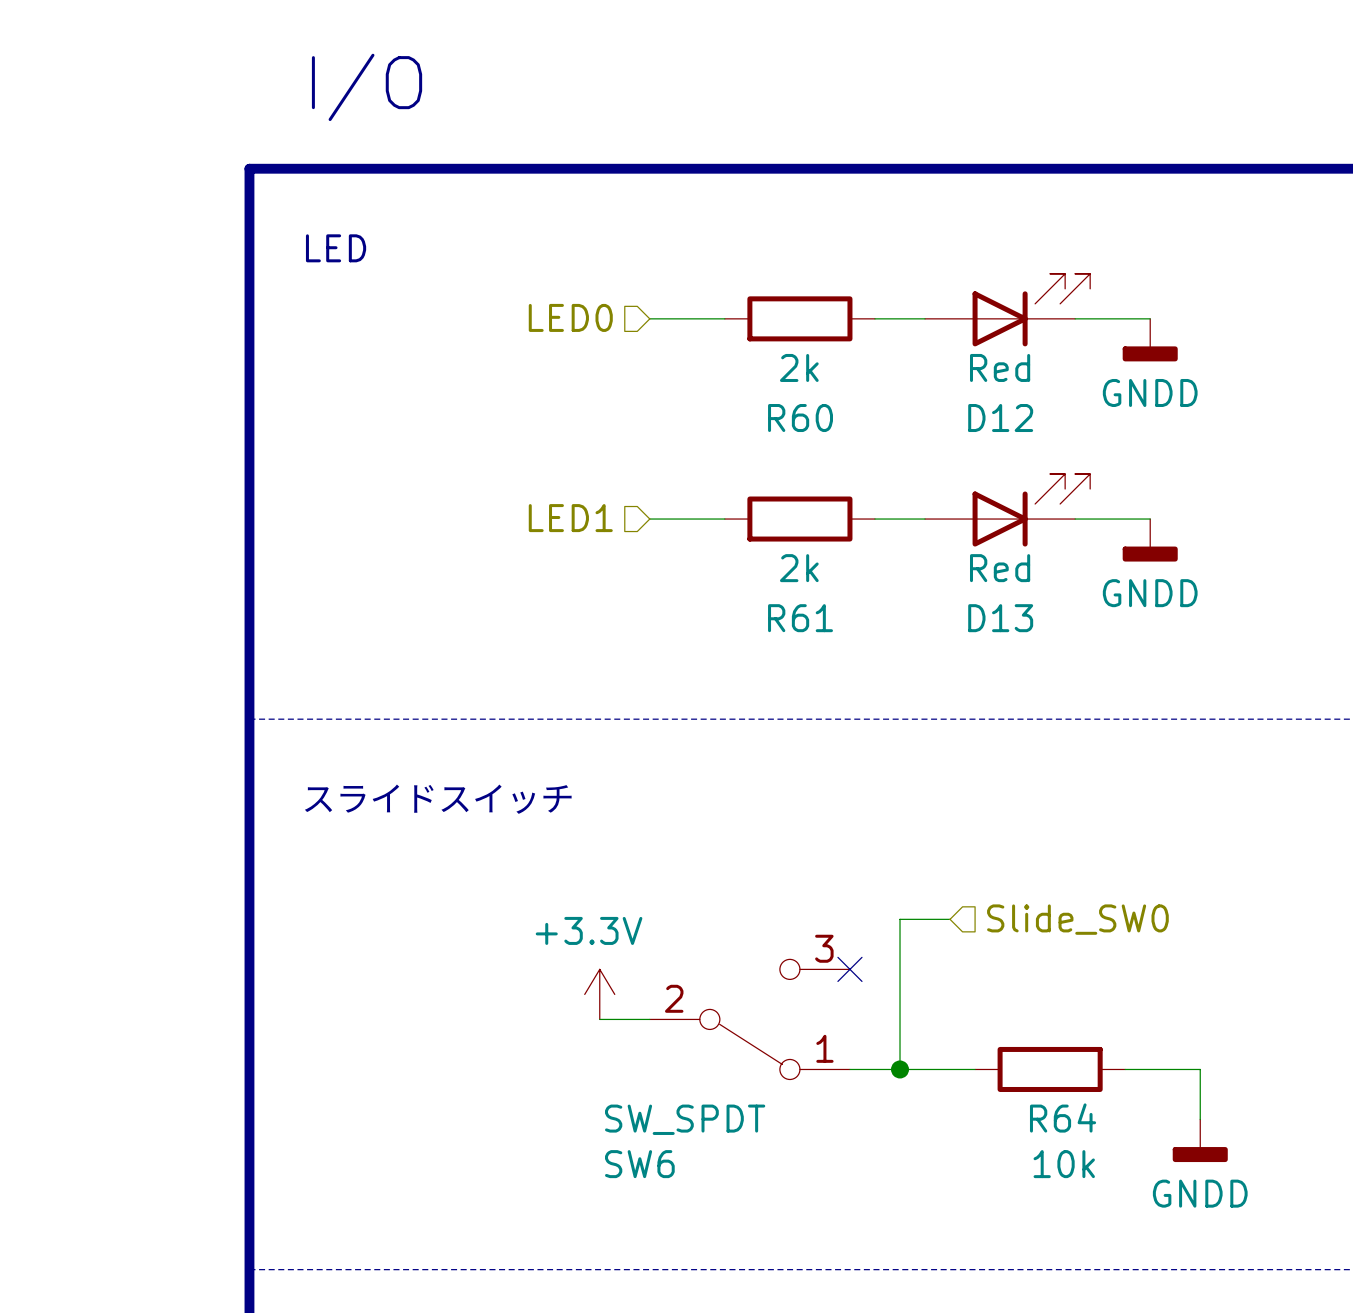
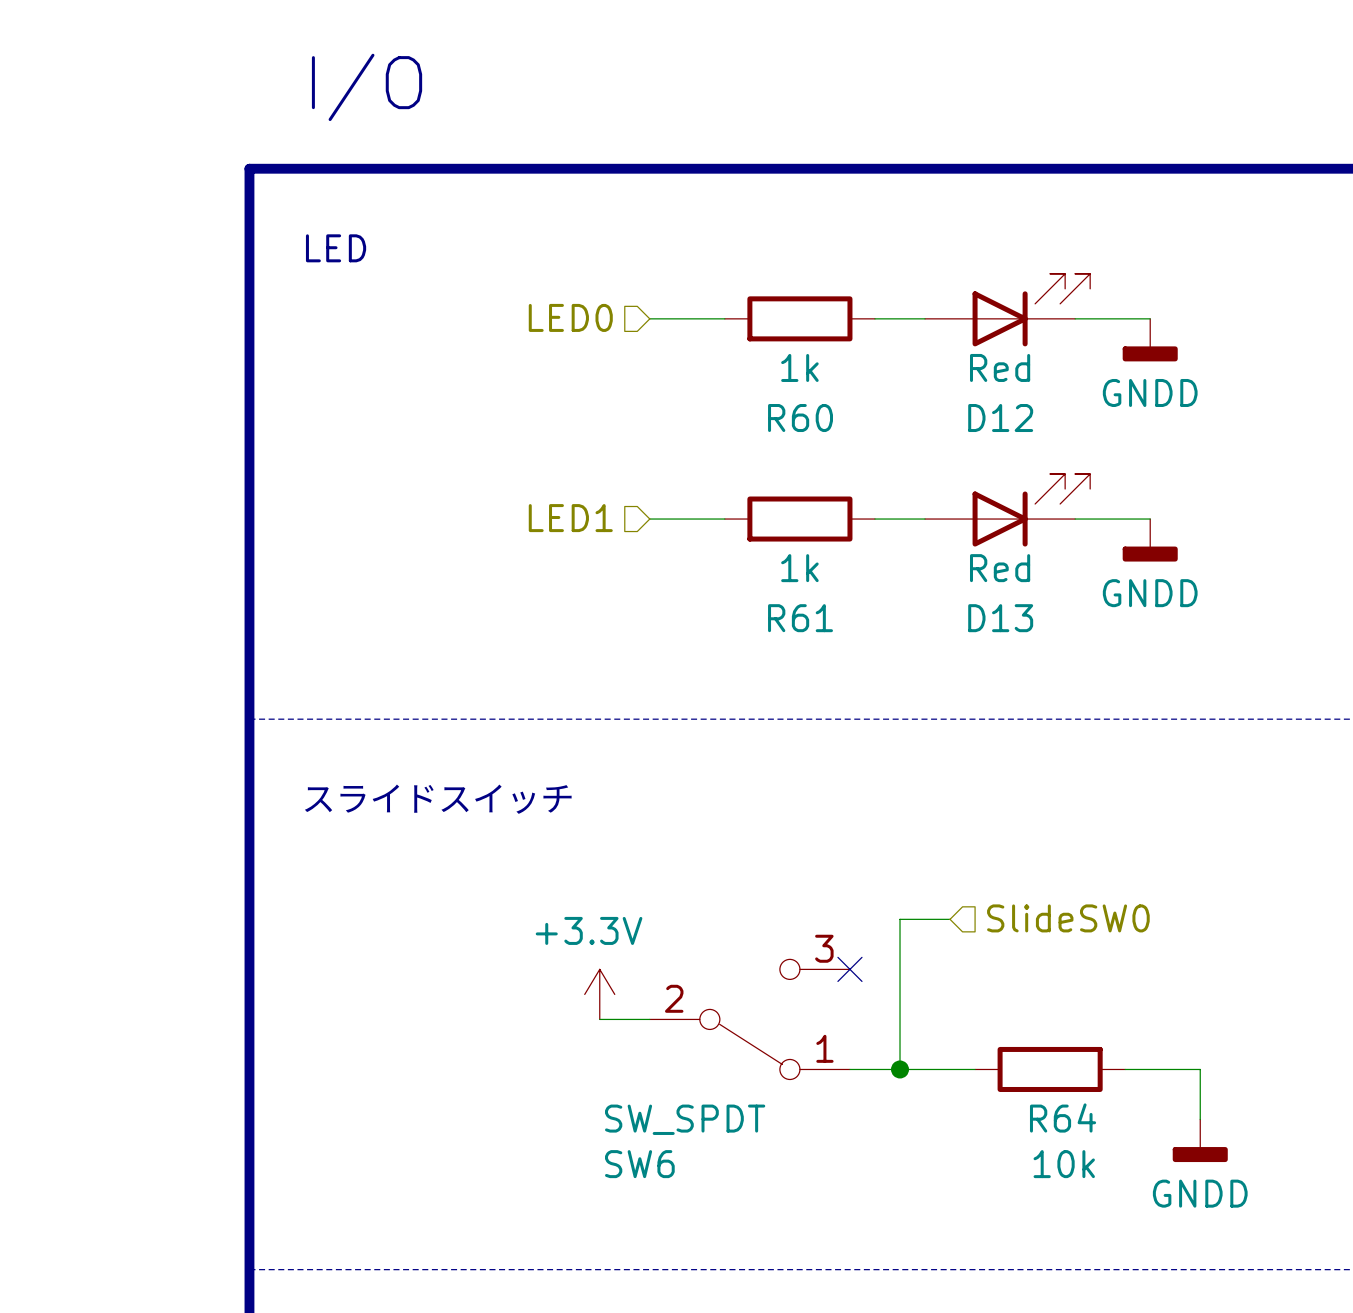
R60 value: 2k (799, 367) -> 1k (799, 367)
R61 value: 2k (799, 568) -> 1k (799, 568)
hierarchical label: Slide_SW0 (1077, 919) -> SlideSW0 (1068, 918)

